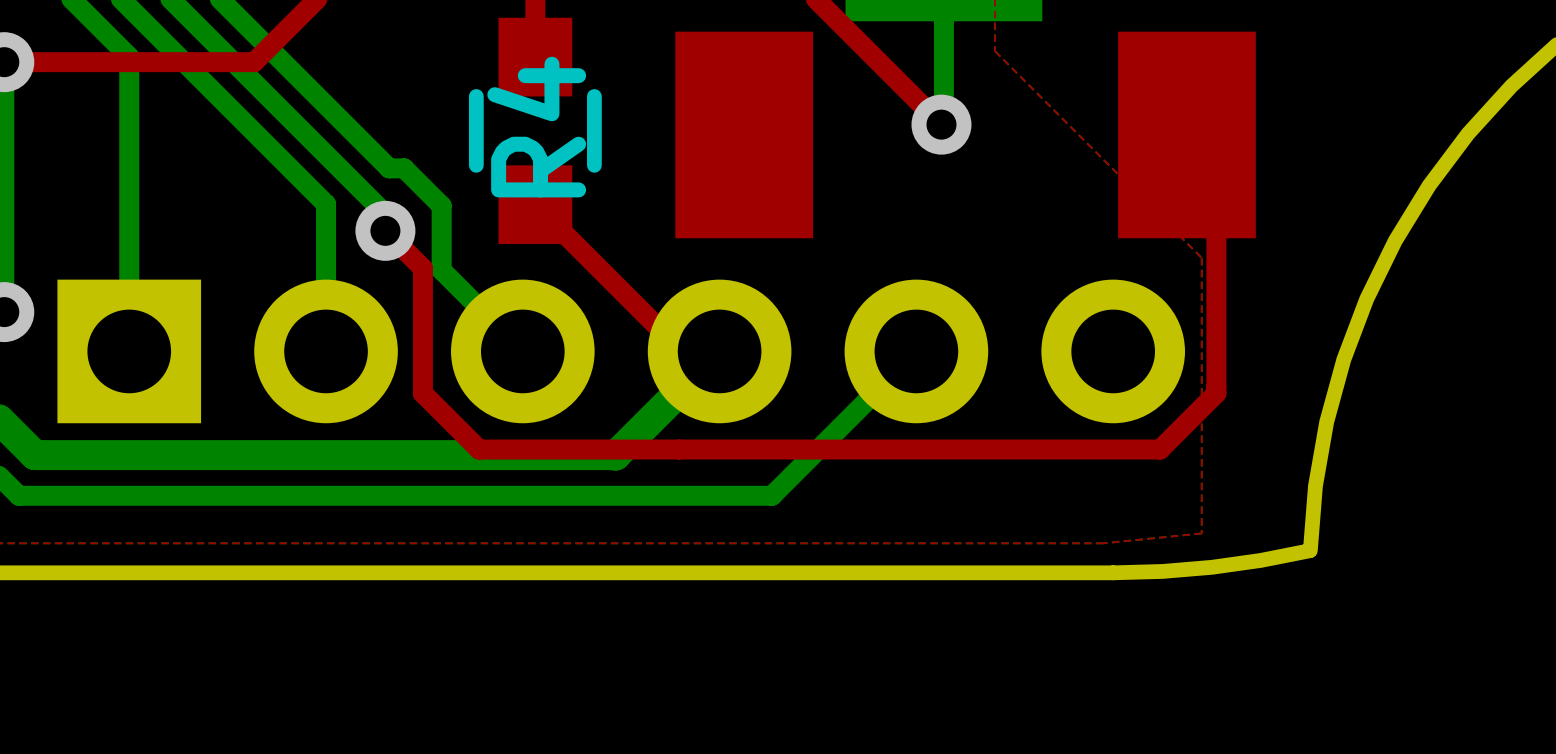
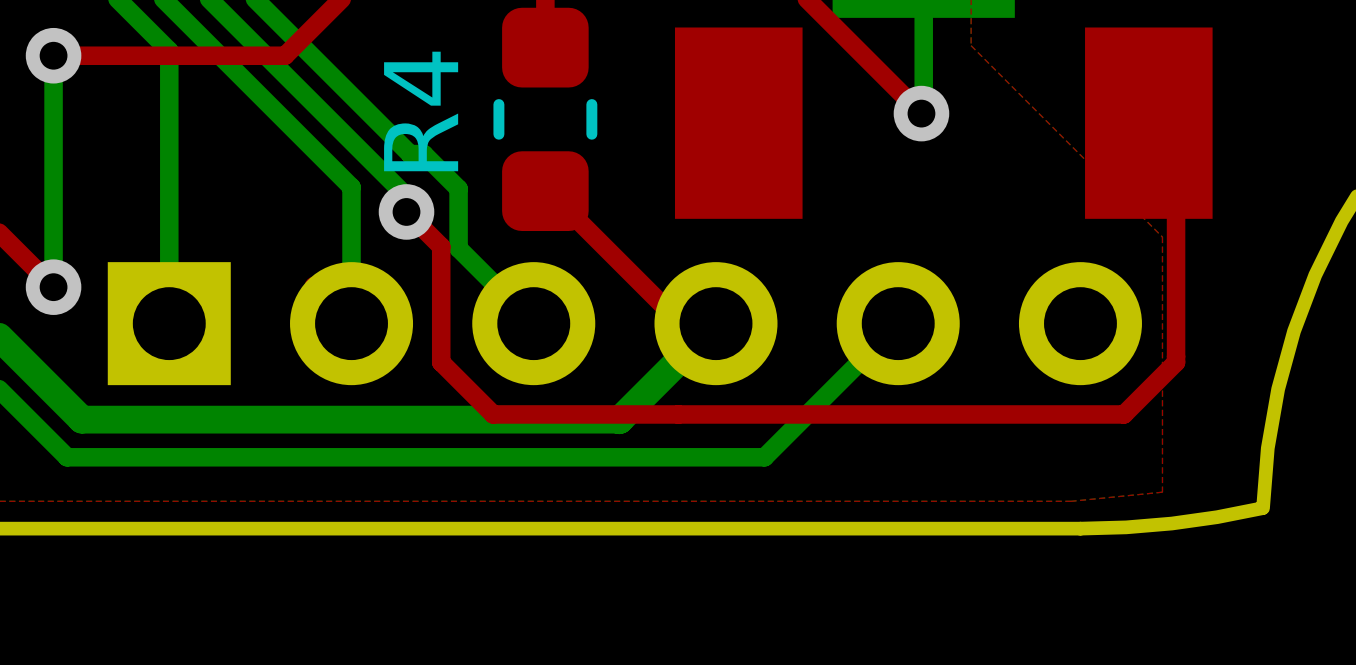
R4 footprint: [468, 17, 602, 245] -> [493, 7, 598, 232]
R4 name position: R4 (536, 127) -> R4 (421, 111)
part footprint: [57, 279, 1185, 424] -> [107, 262, 1142, 386]

